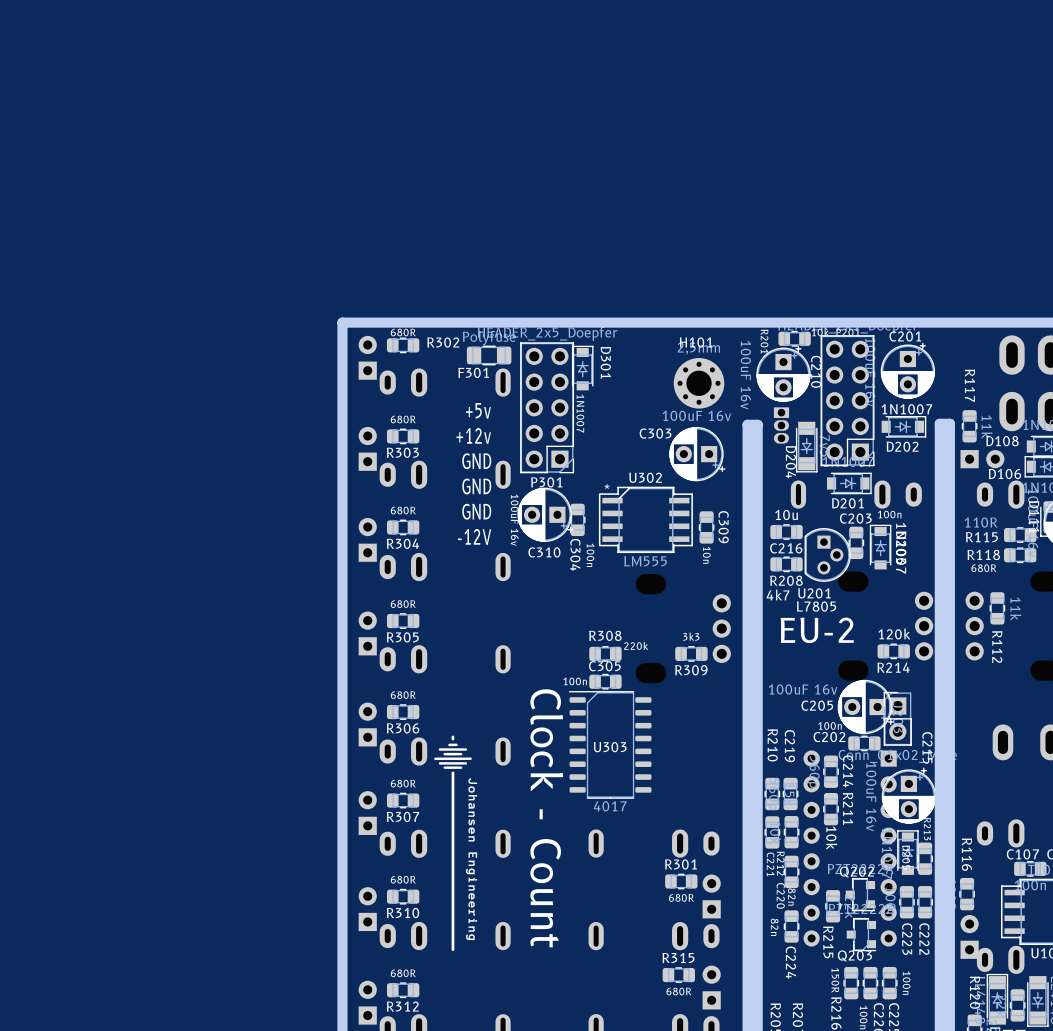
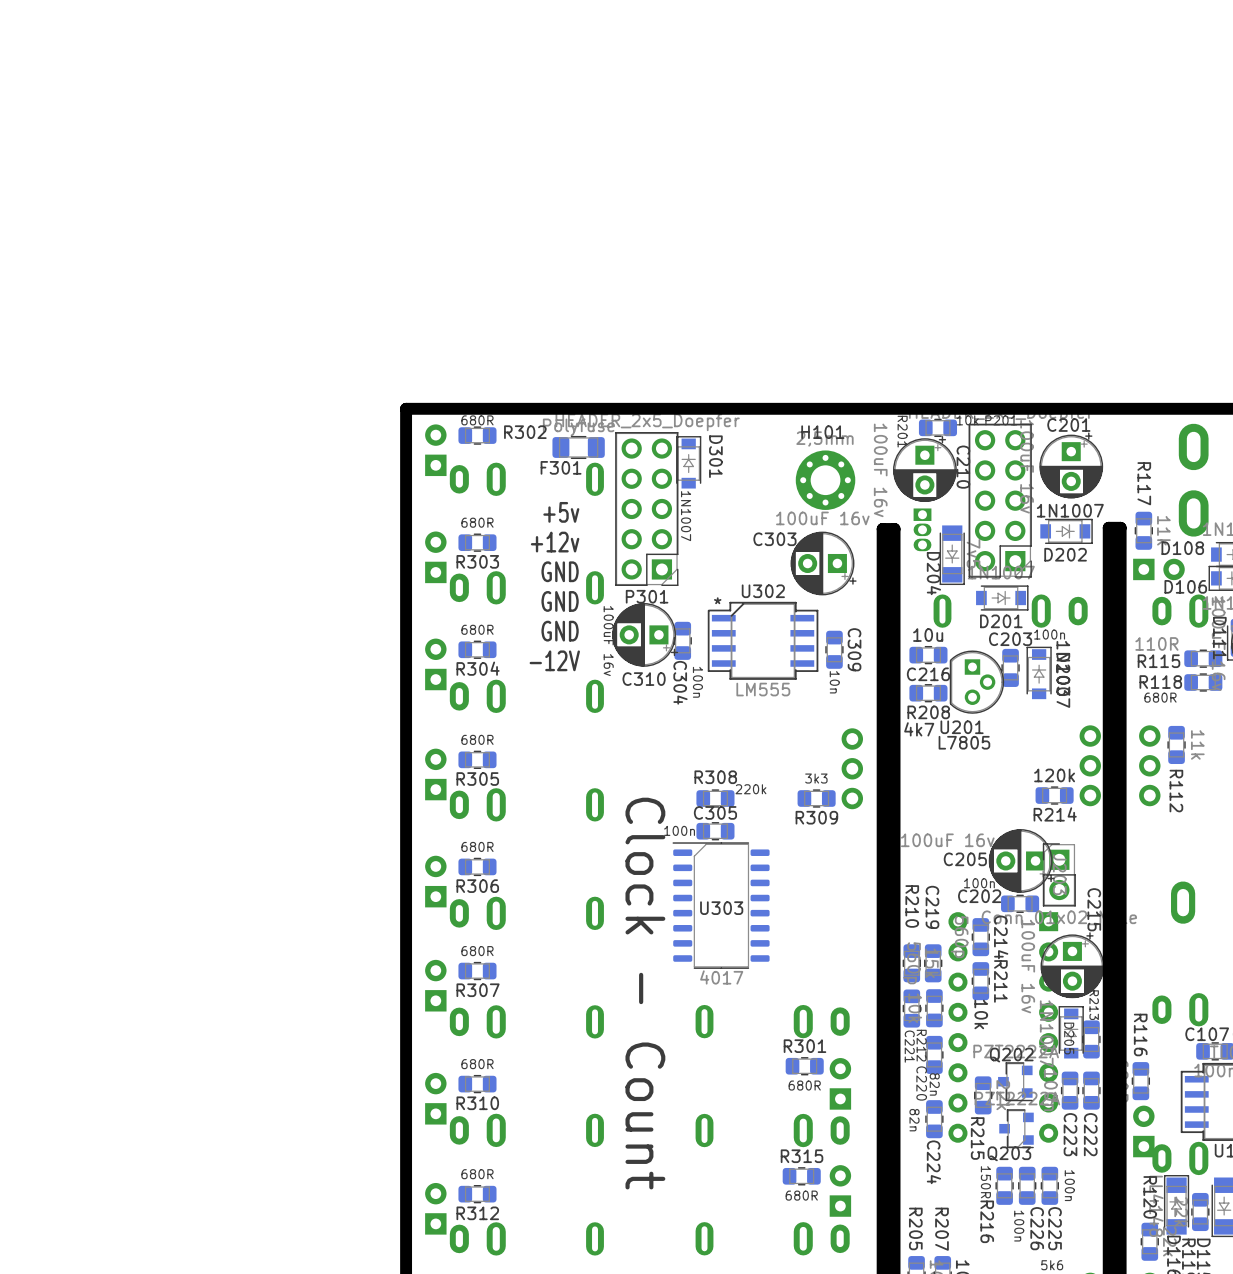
text: EU-2 (817, 630) -> none
drawing: [434, 735, 478, 951] -> none

